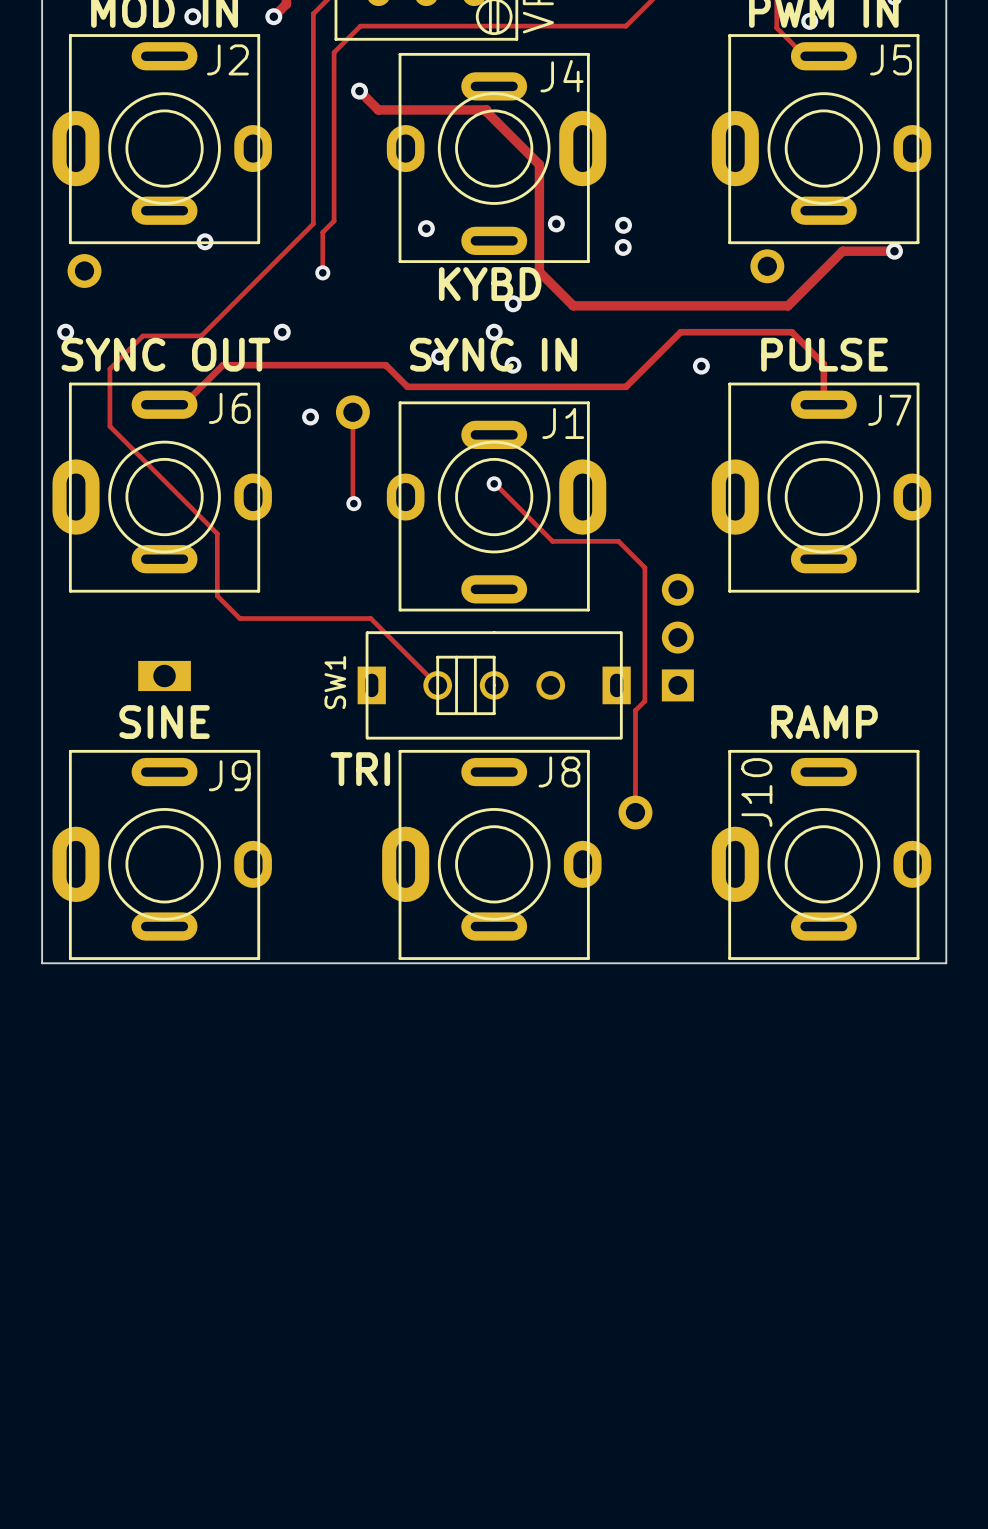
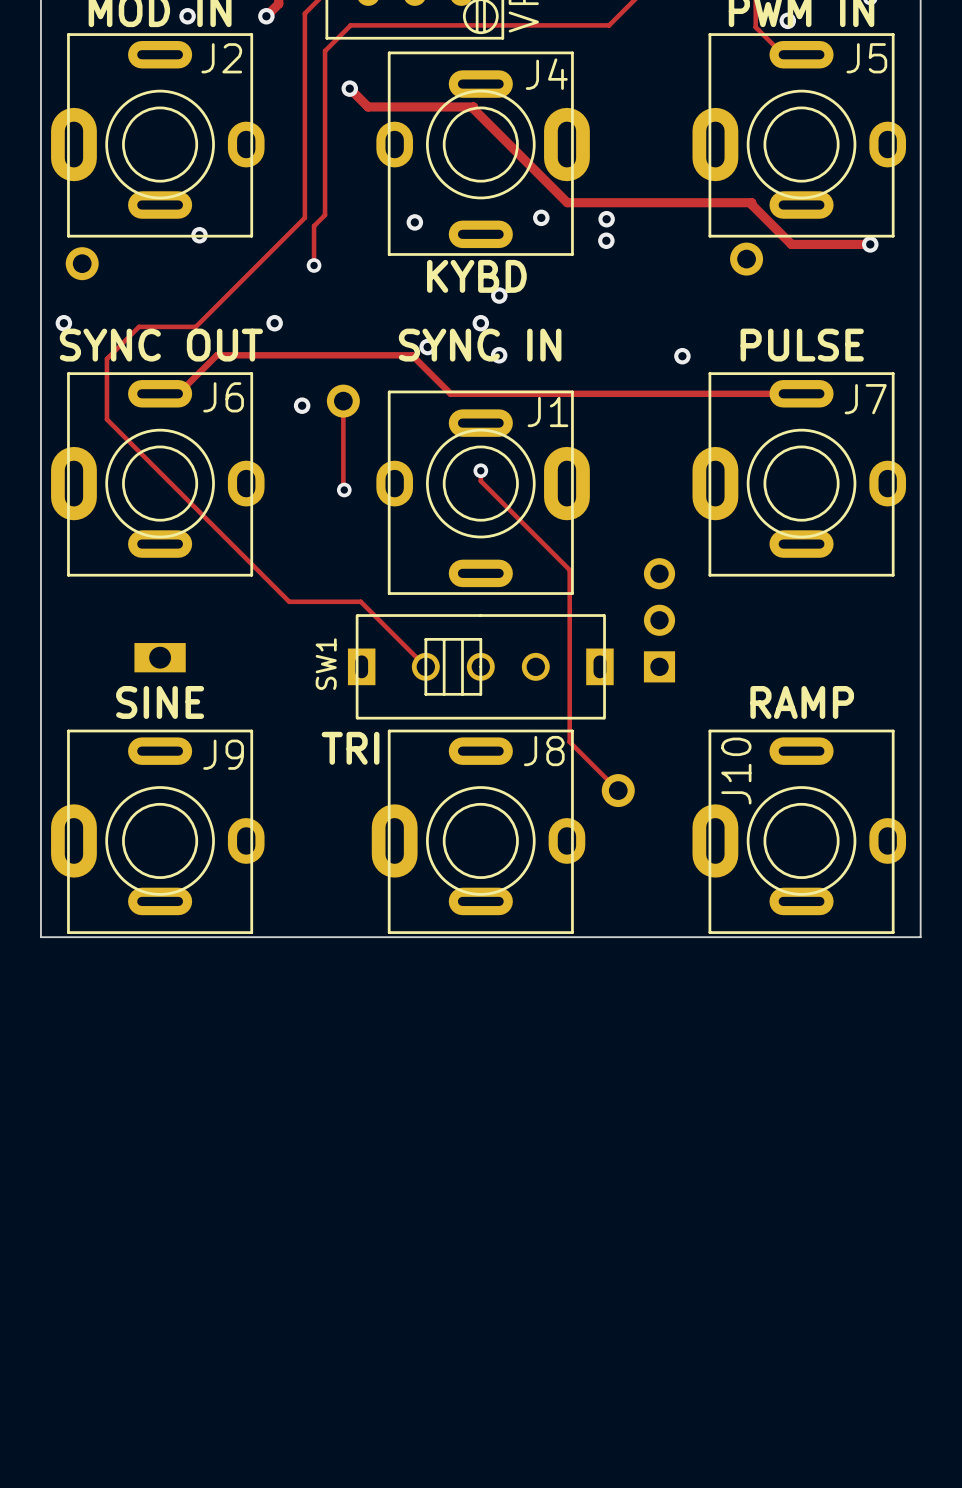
track: (539, 164) (539, 271) (573, 305) (788, 305) (842, 251) -> (524, 160) (567, 202) (751, 202) (791, 244) (819, 244)
track: (385, 365) (407, 386) (626, 386) (680, 332) (791, 332) (823, 364) (823, 404) -> (375, 355) (412, 355) (450, 393) (801, 393)
track: (109, 426) (217, 533) (217, 595) (239, 618) (297, 618) -> (106, 414) (106, 419) (289, 601)
track: (494, 483) (552, 541) (618, 541) (644, 567) (644, 701) (635, 710) -> (480, 470) (480, 481) (569, 570) (569, 741) (618, 790)
track: (635, 710) (635, 812) -> none

